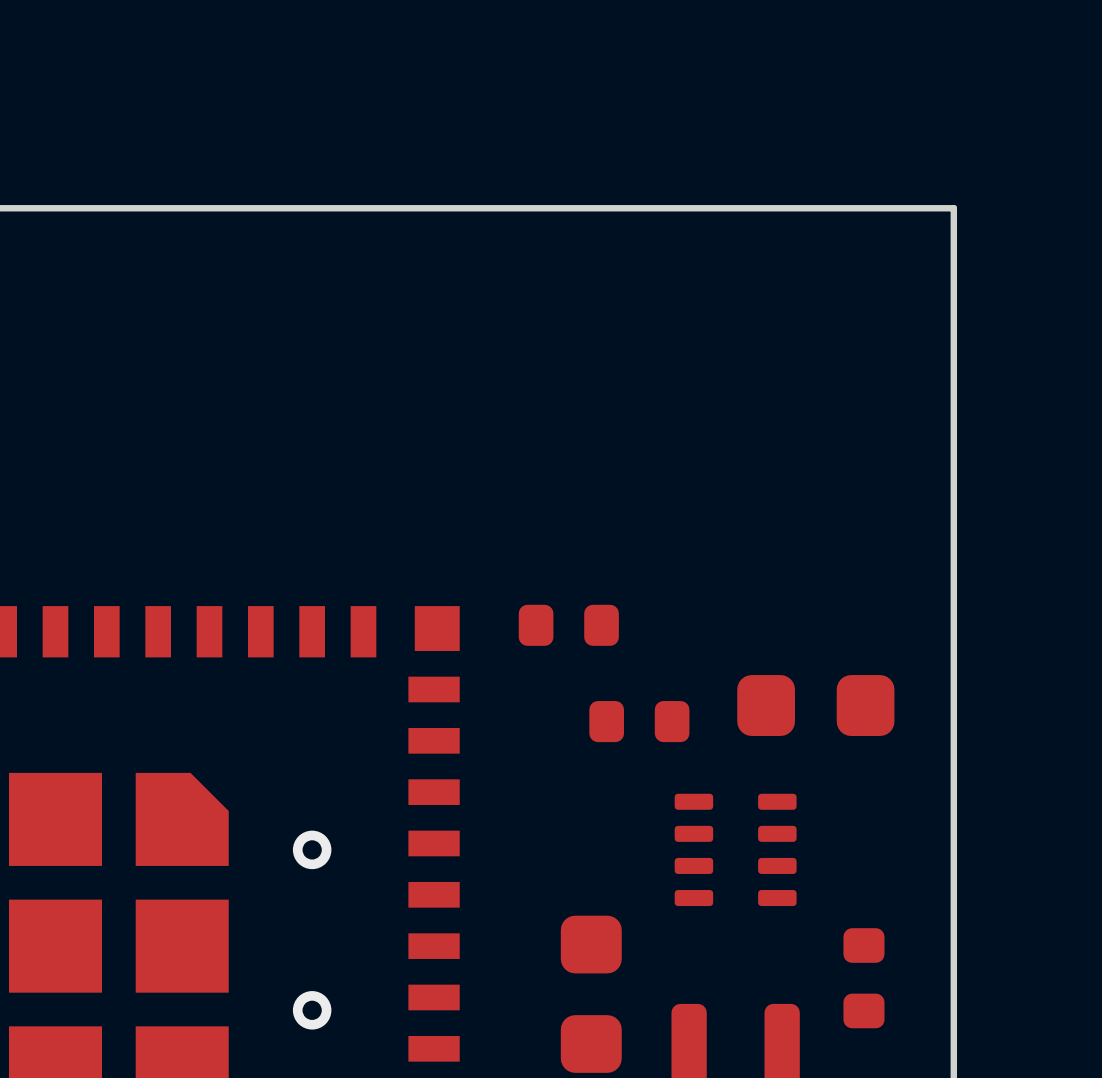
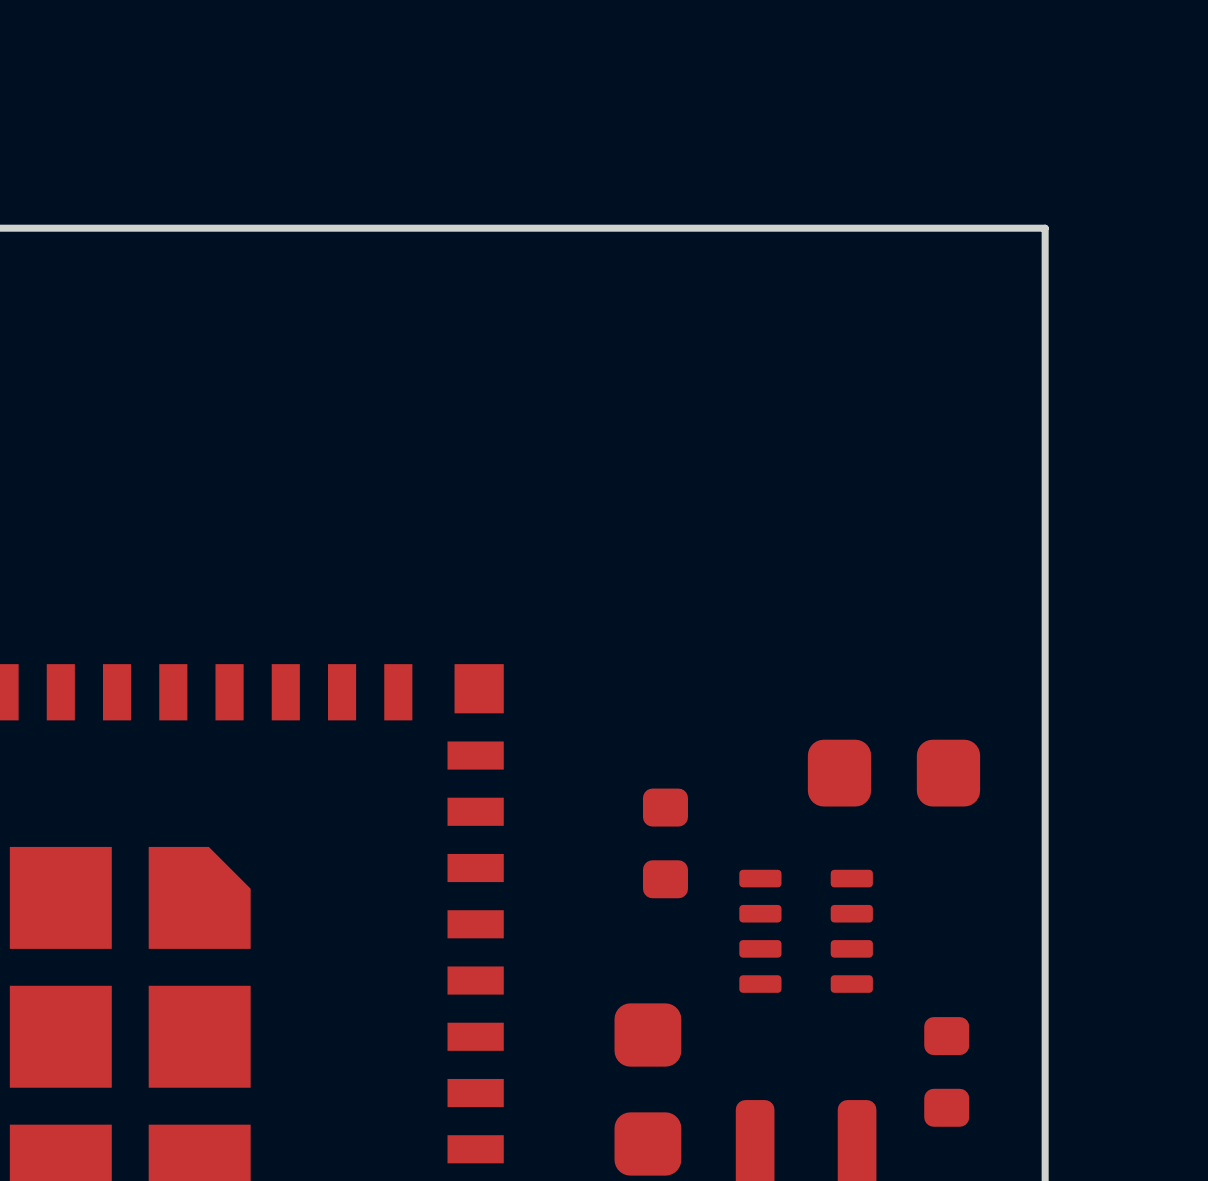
part: (568, 625) -> none
part rotation: 0° (639, 721) -> 90° clockwise (665, 843)
via: (312, 849) -> none
via: (312, 1010) -> none

